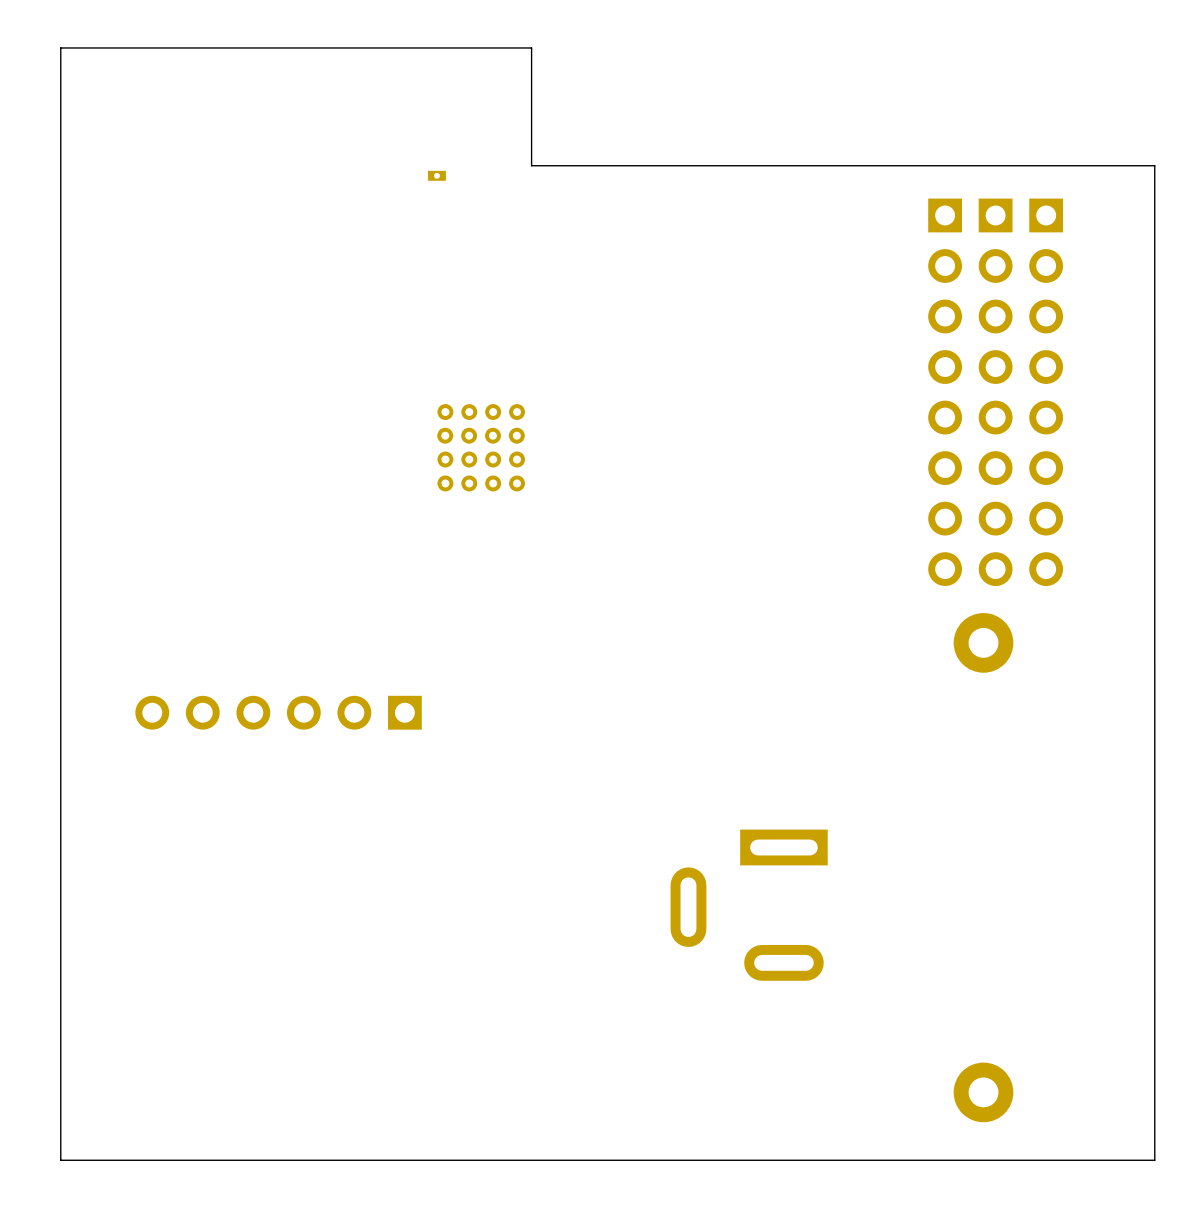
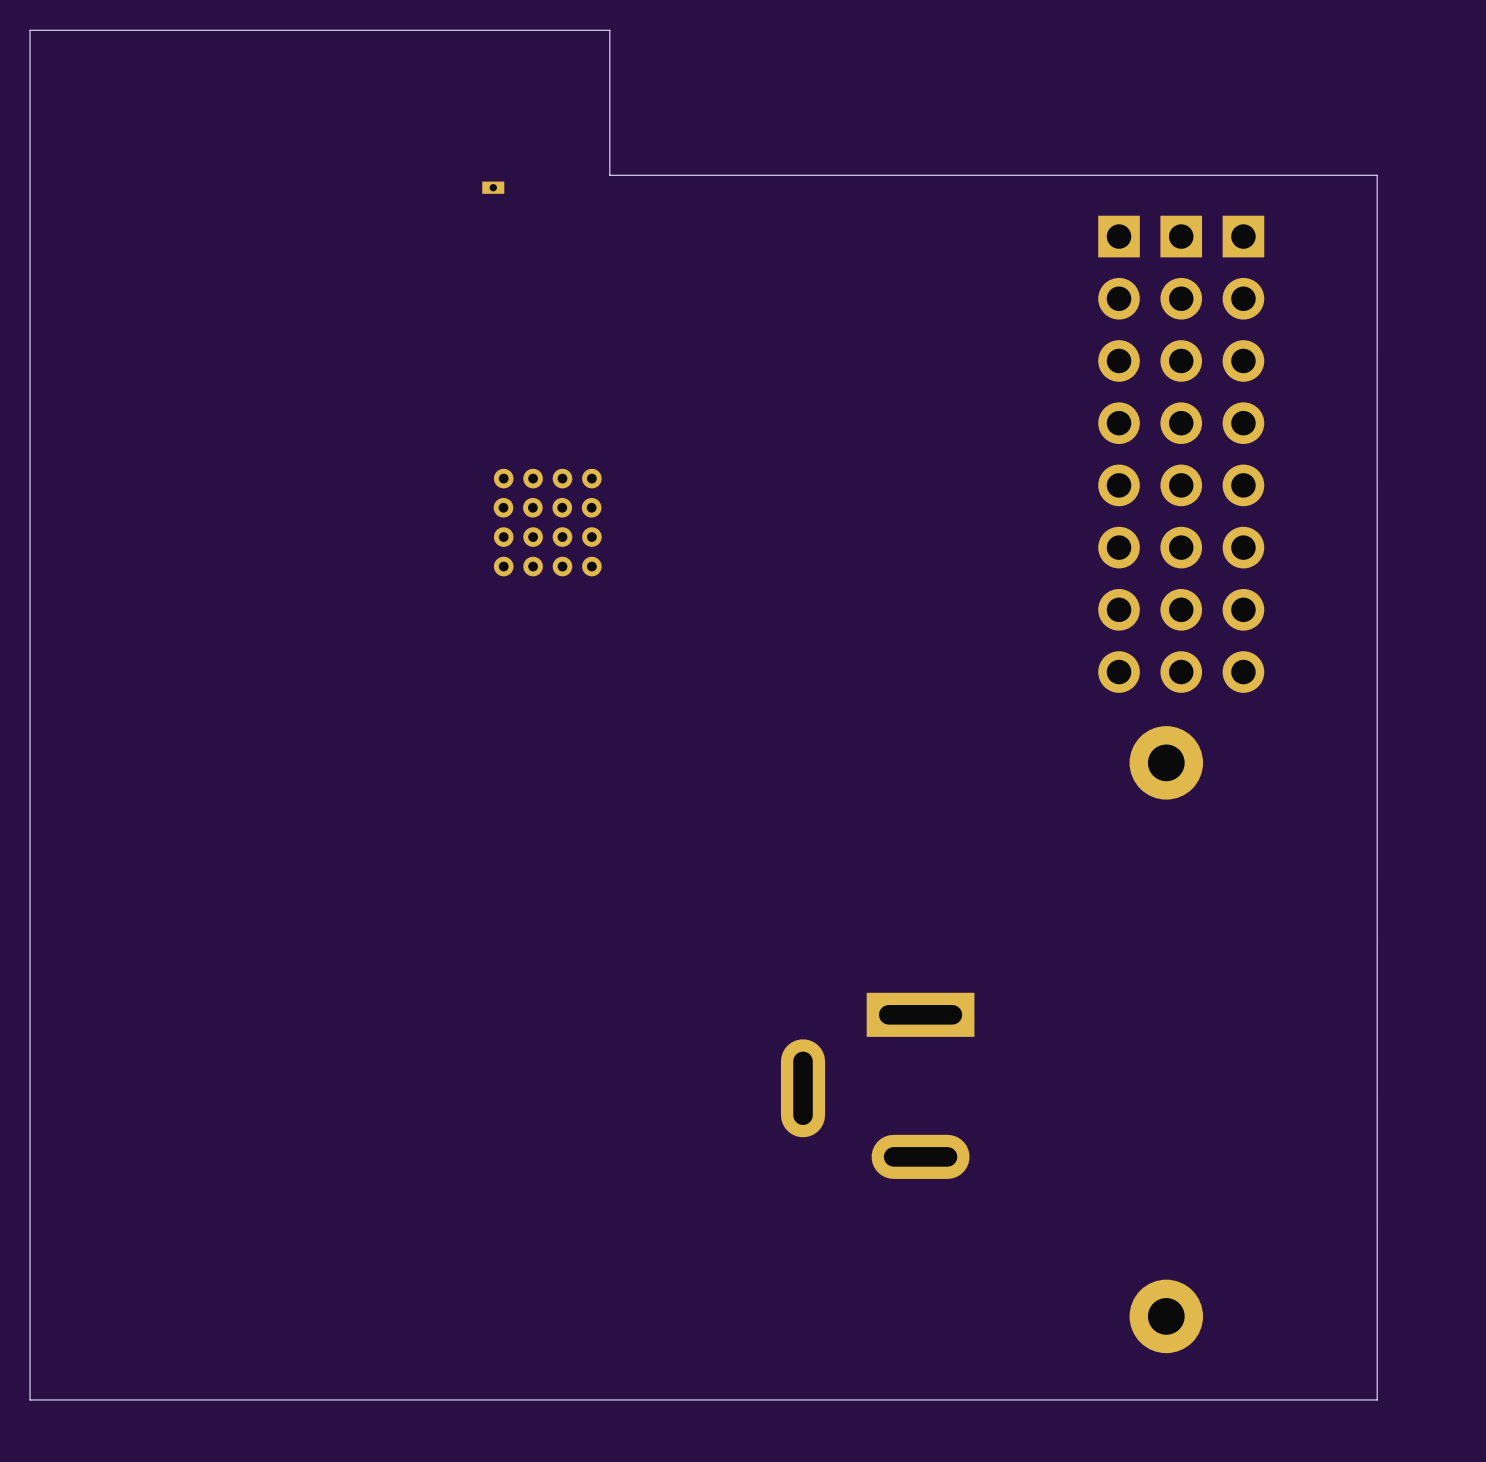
part: (278, 712) -> none

